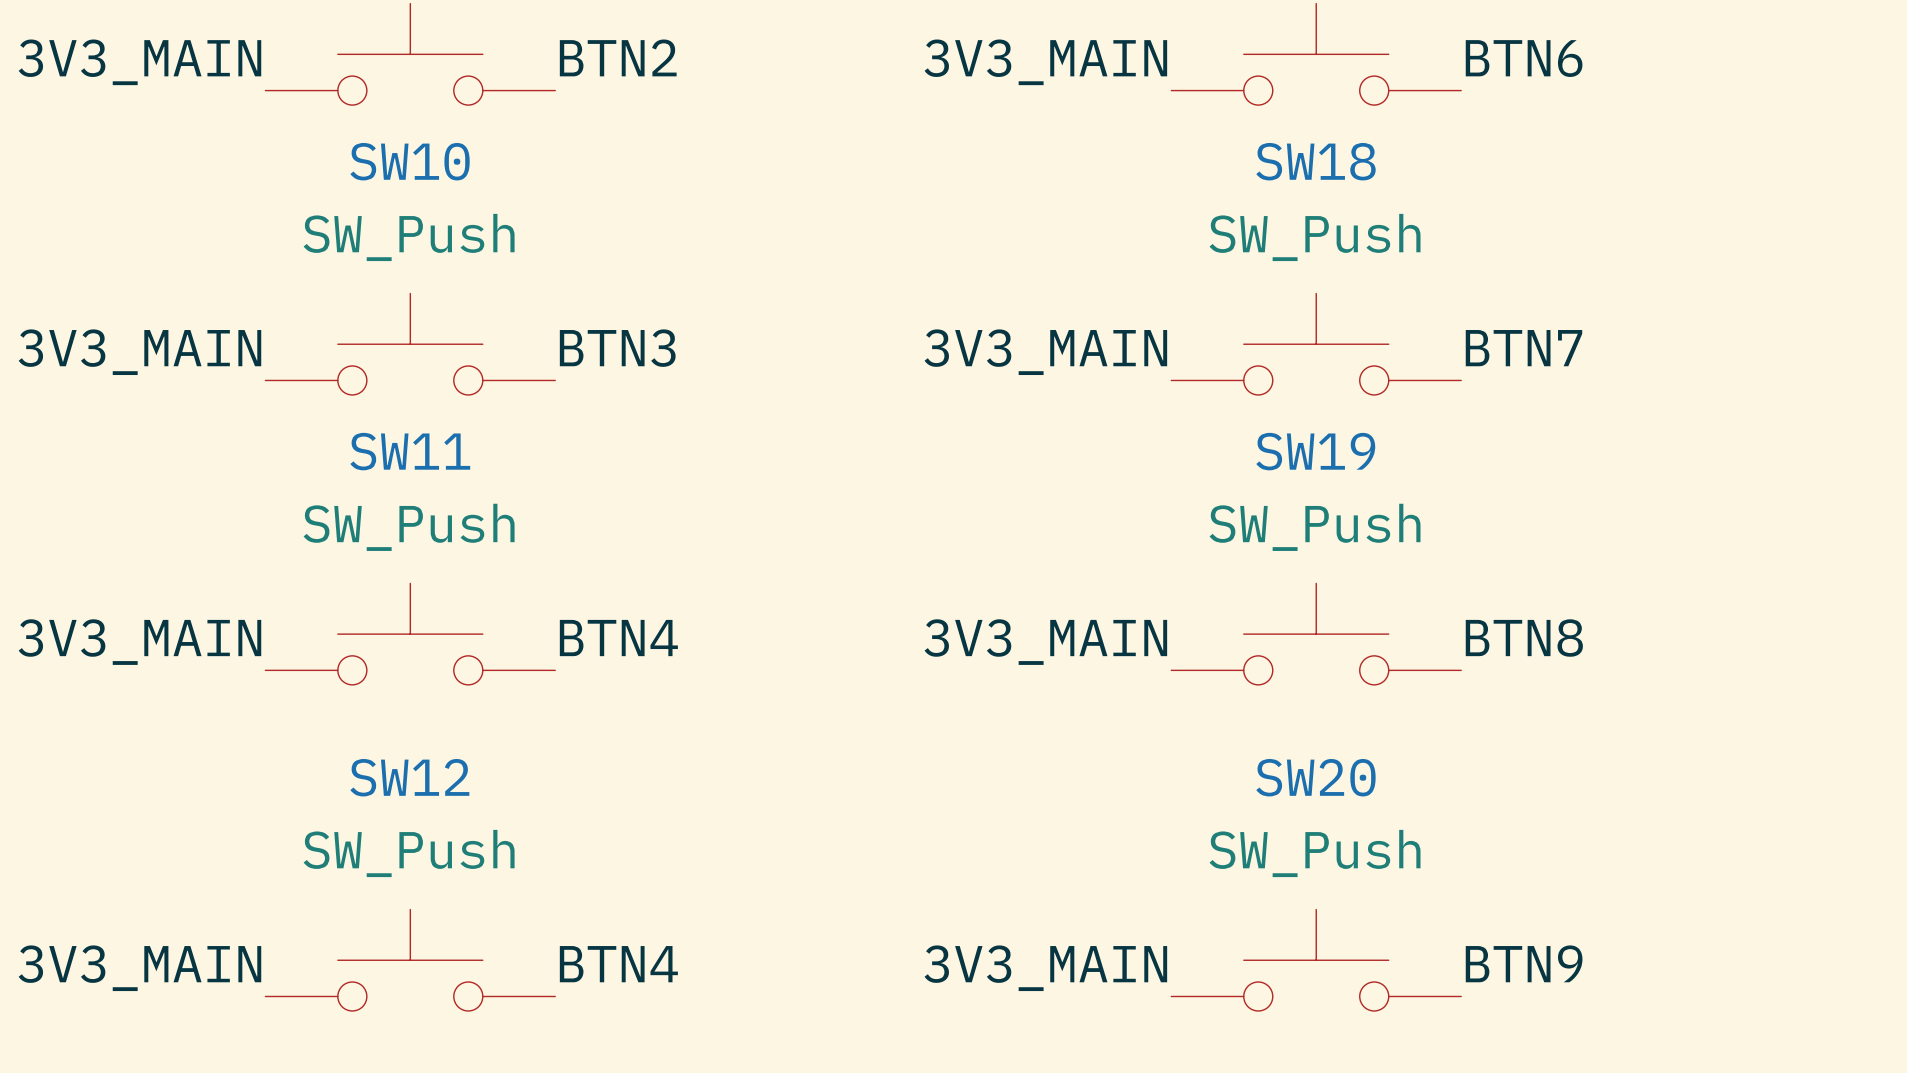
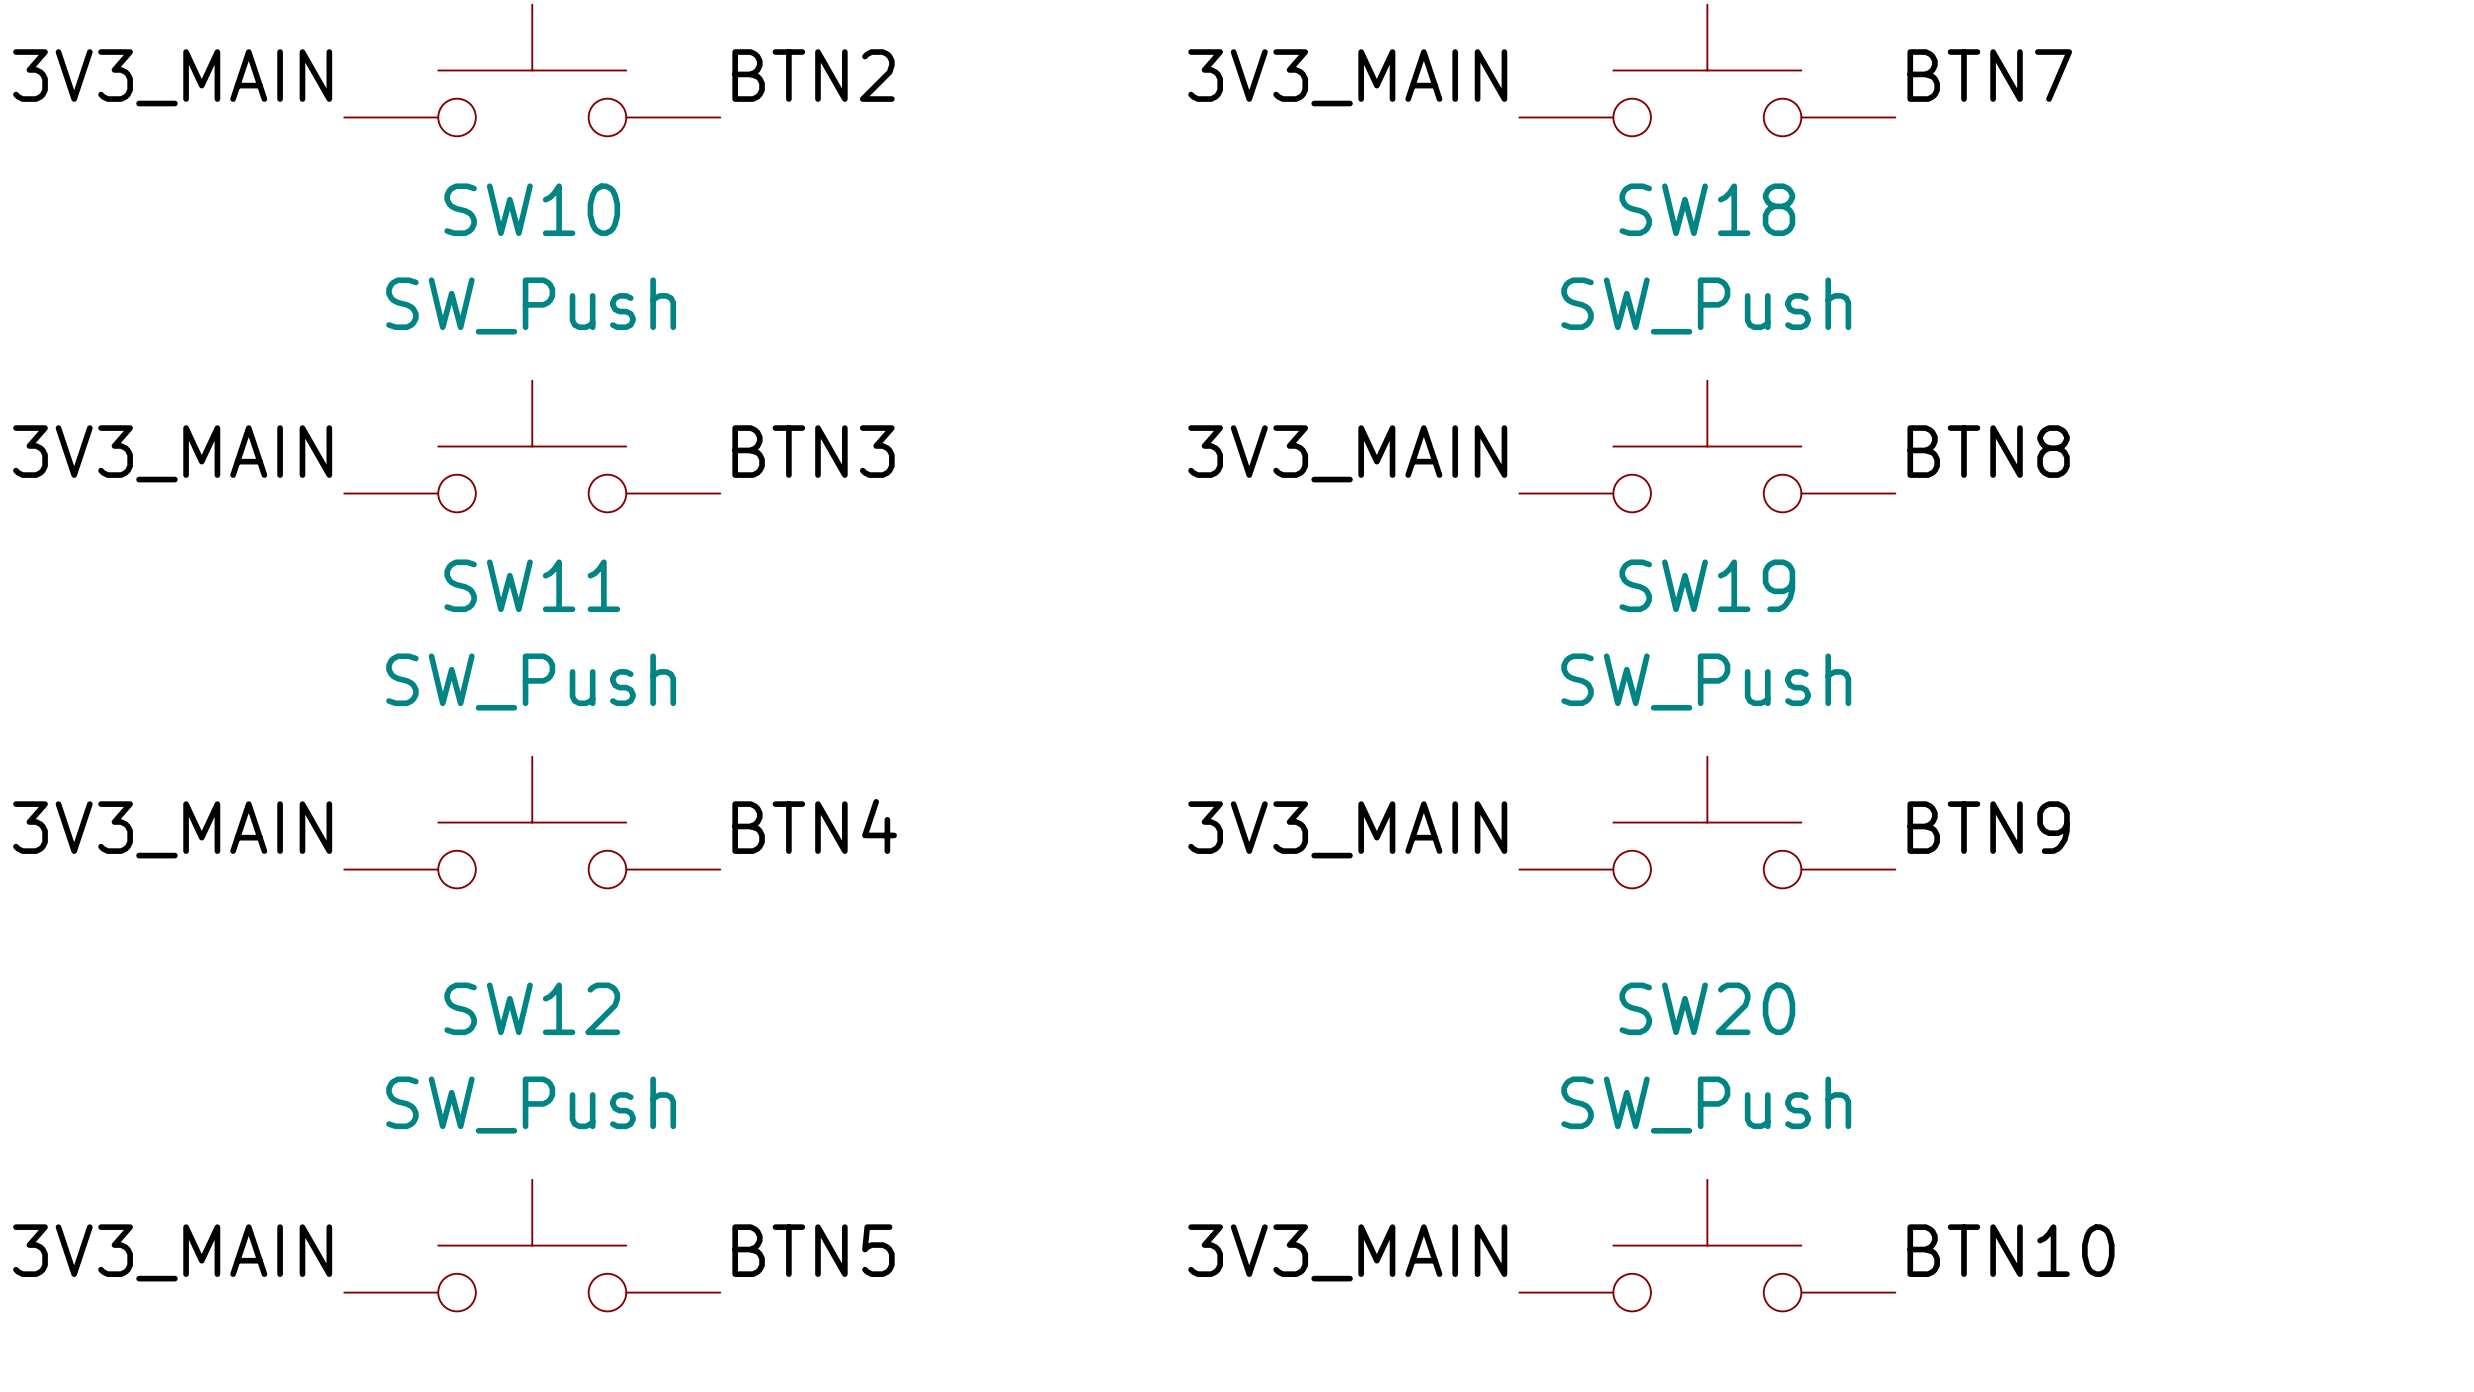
label: BTN6 (1524, 58) -> BTN7 (1989, 75)
label: BTN7 (1523, 348) -> BTN8 (1988, 451)
label: BTN8 (1524, 638) -> BTN9 (1988, 827)
label: BTN9 (1524, 963) -> BTN10 (2011, 1250)
label: BTN4 (618, 964) -> BTN5 (813, 1250)

